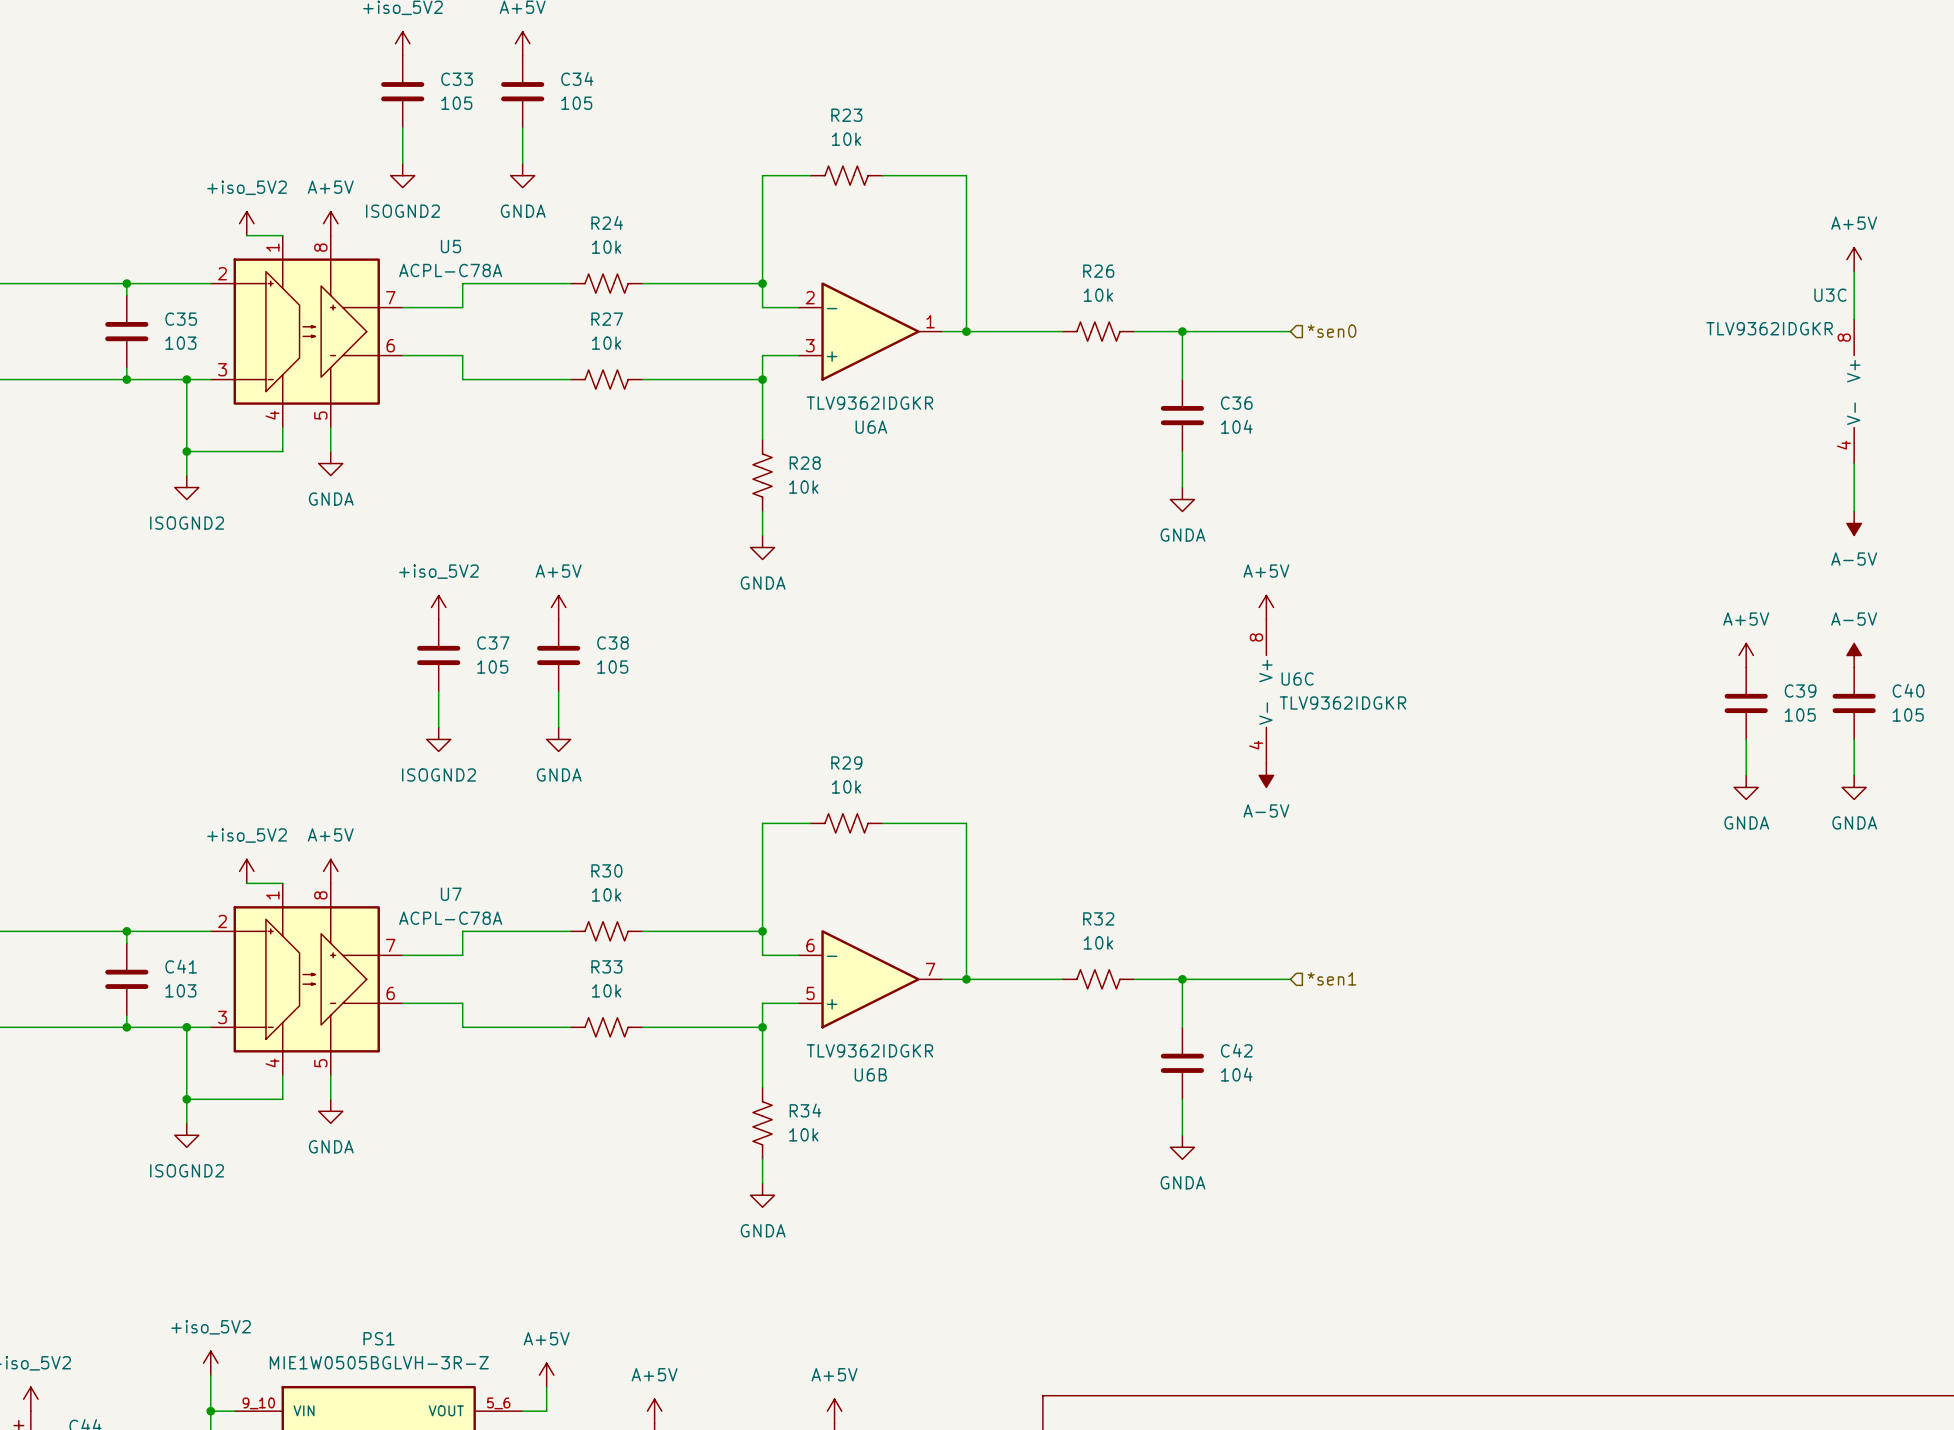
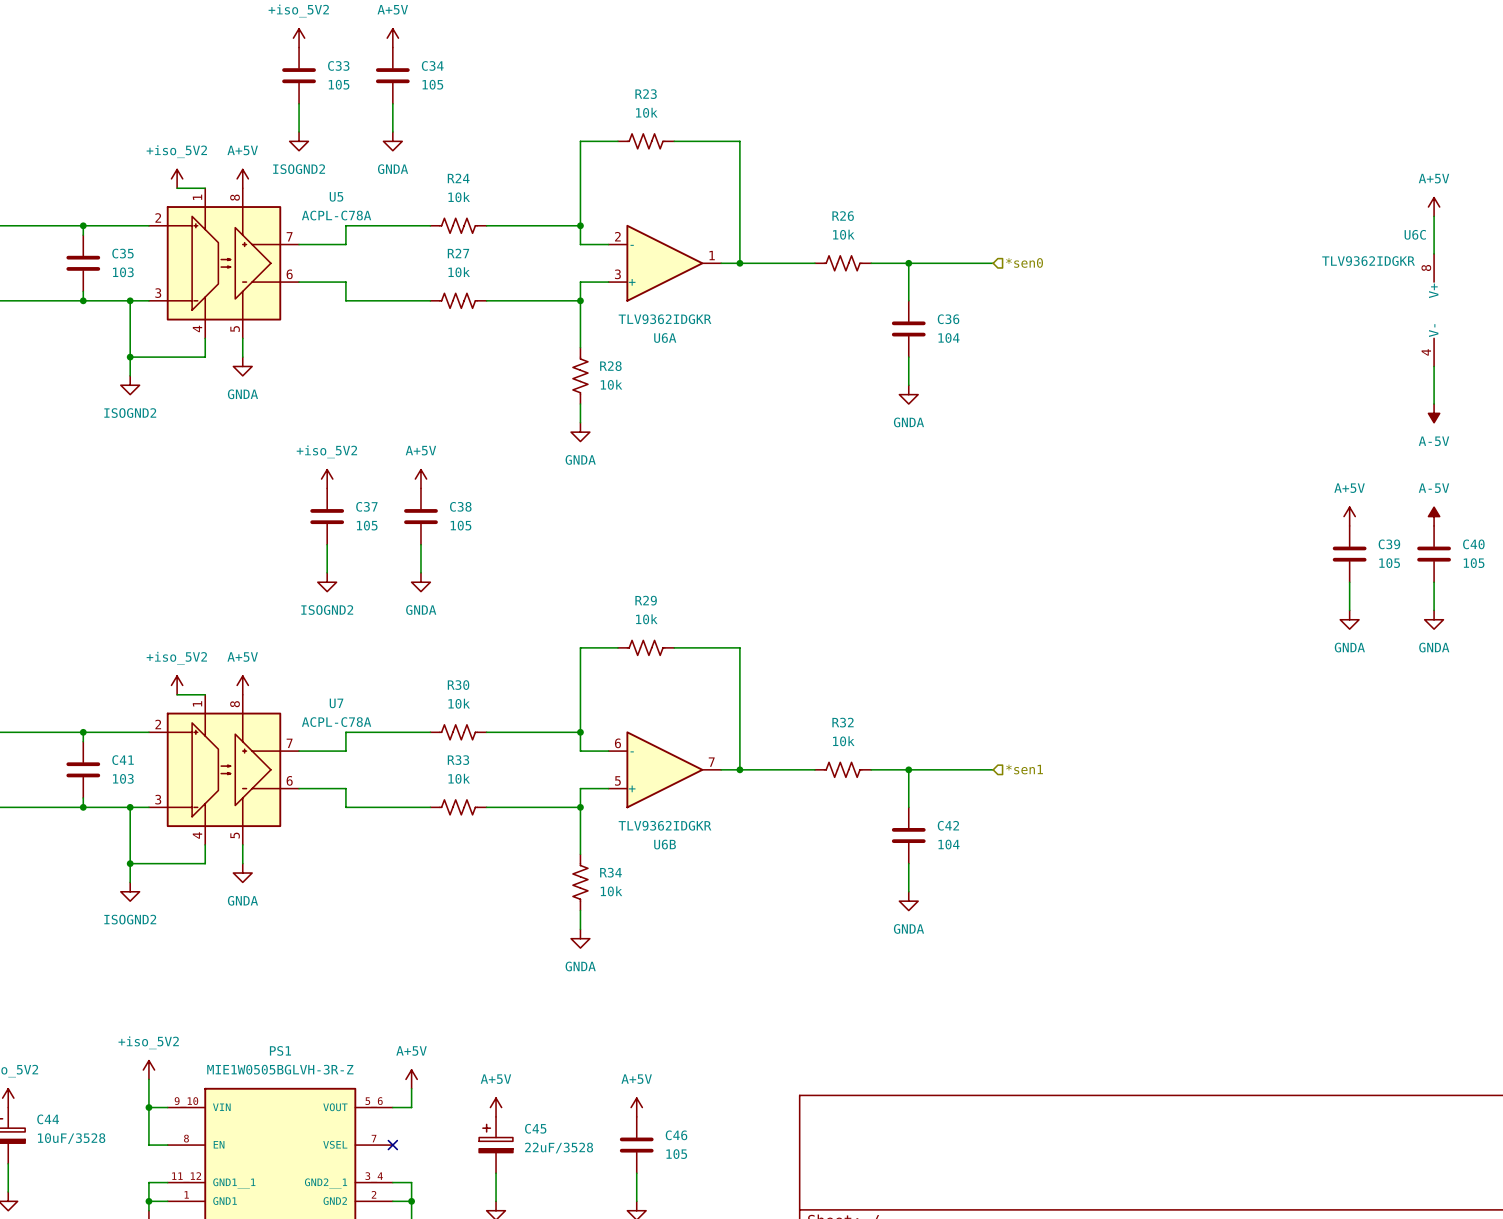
U3C name: U3C (1830, 295) -> U6C (1415, 234)
power symbol: A+5V (1266, 607) -> none
U6C: TLV9362IDGKR (1266, 691) -> none
power symbol: A-5V (1266, 775) -> none

